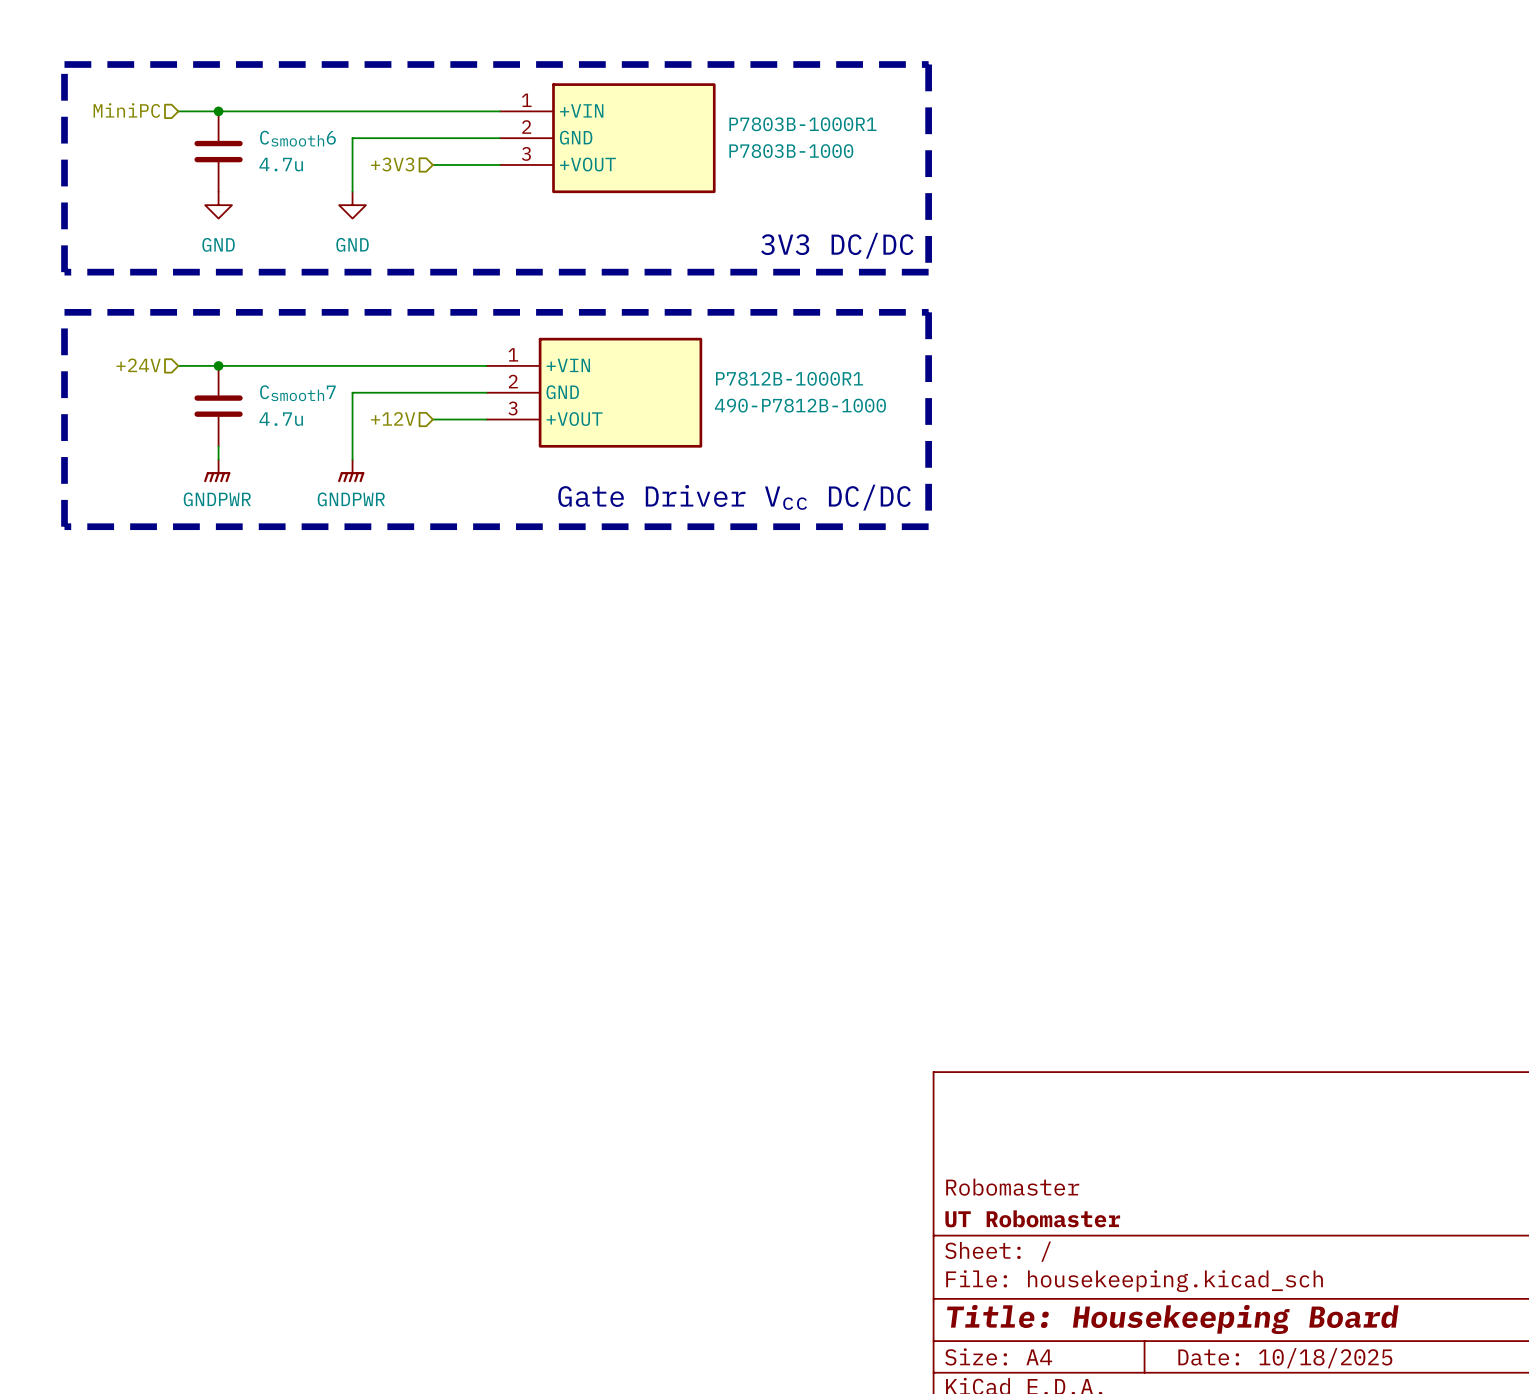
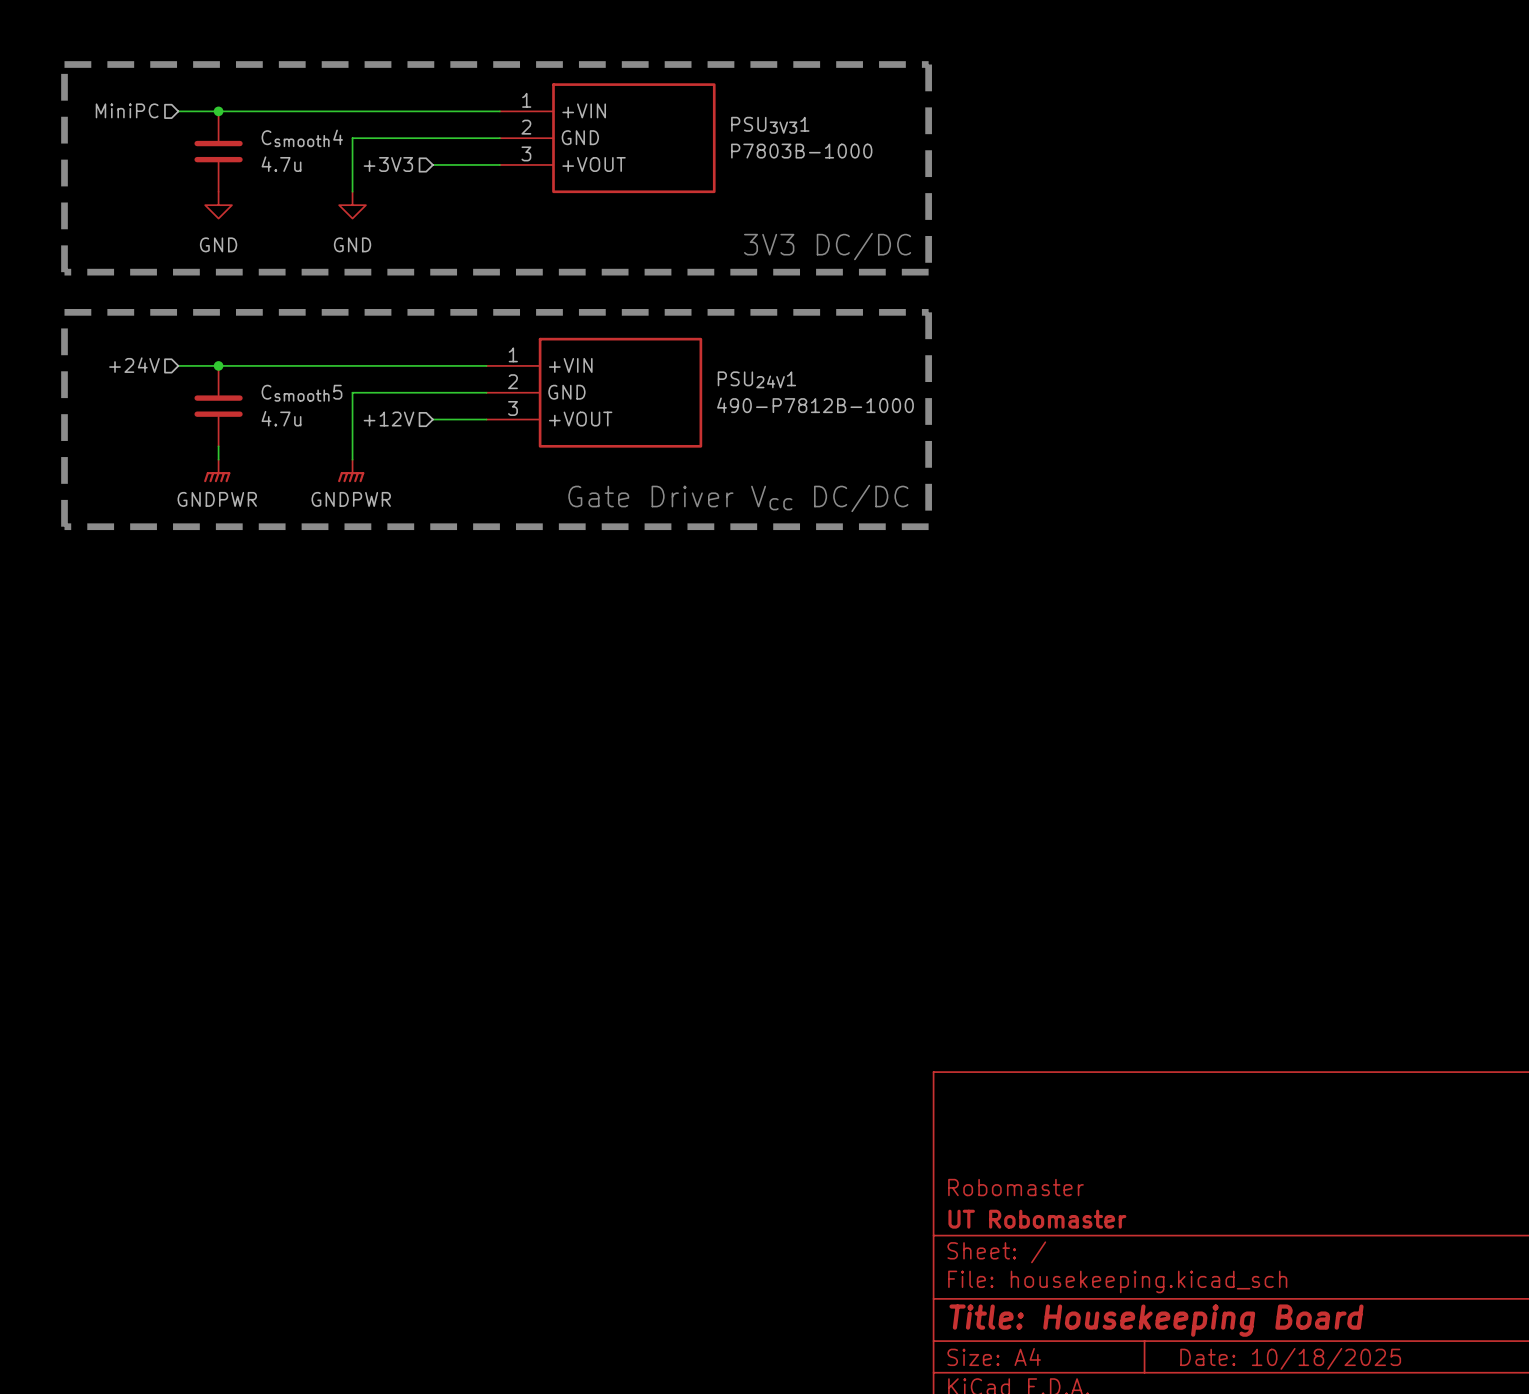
P7803B-1000R1 name: P7803B-1000R1 (802, 124) -> PSU3V31 (770, 125)
Csmooth6 name: Csmooth6 (297, 138) -> Csmooth4 (302, 138)
P7812B-1000R1 name: P7812B-1000R1 (789, 378) -> PSU24V1 (756, 379)
Csmooth7 name: Csmooth7 (297, 393) -> Csmooth5 (301, 393)

